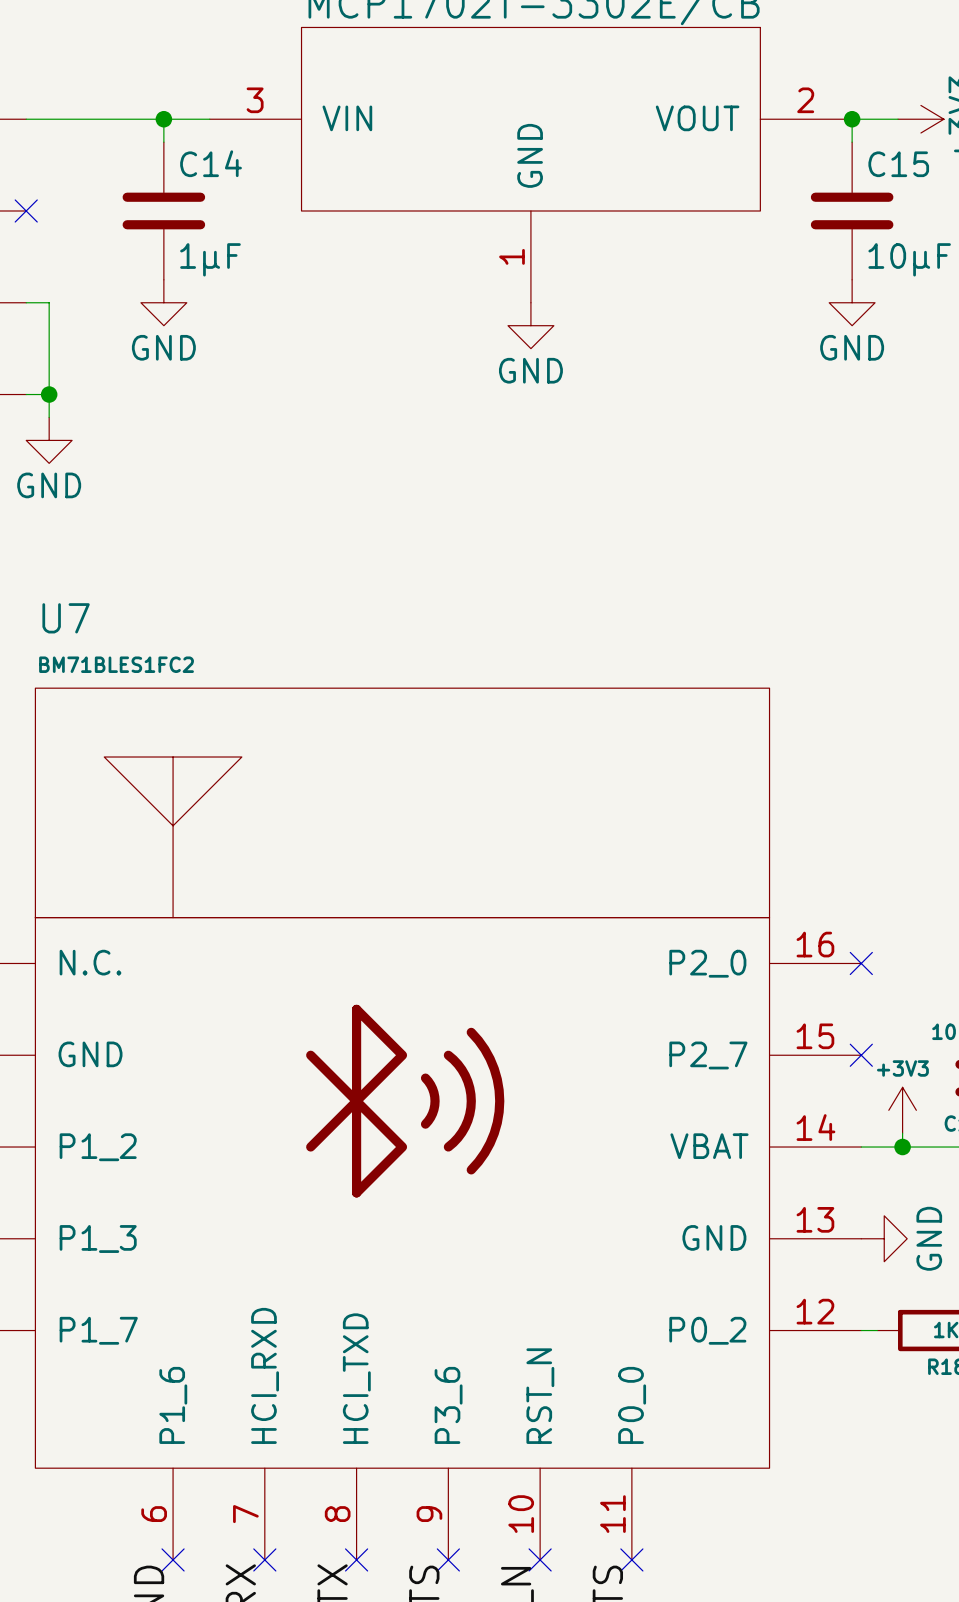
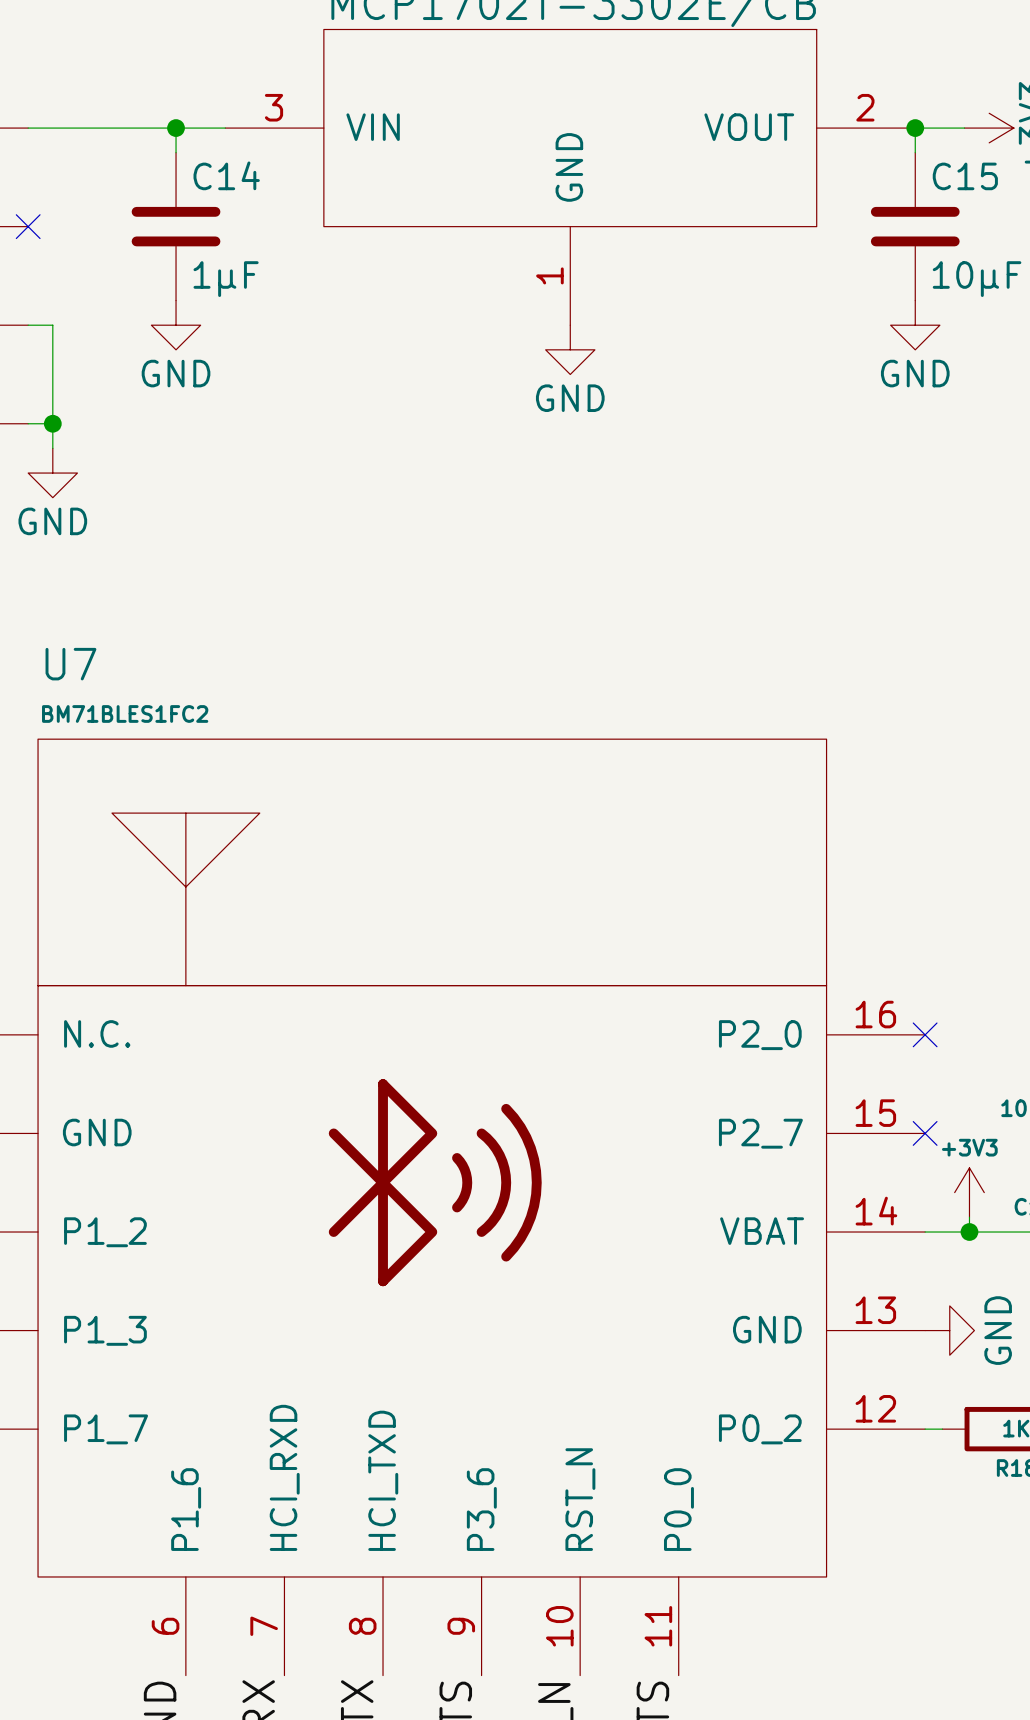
no-connect mark: (173, 1559) -> none
no-connect mark: (264, 1559) -> none
no-connect mark: (356, 1559) -> none
no-connect mark: (448, 1559) -> none
no-connect mark: (540, 1559) -> none
no-connect mark: (631, 1559) -> none

